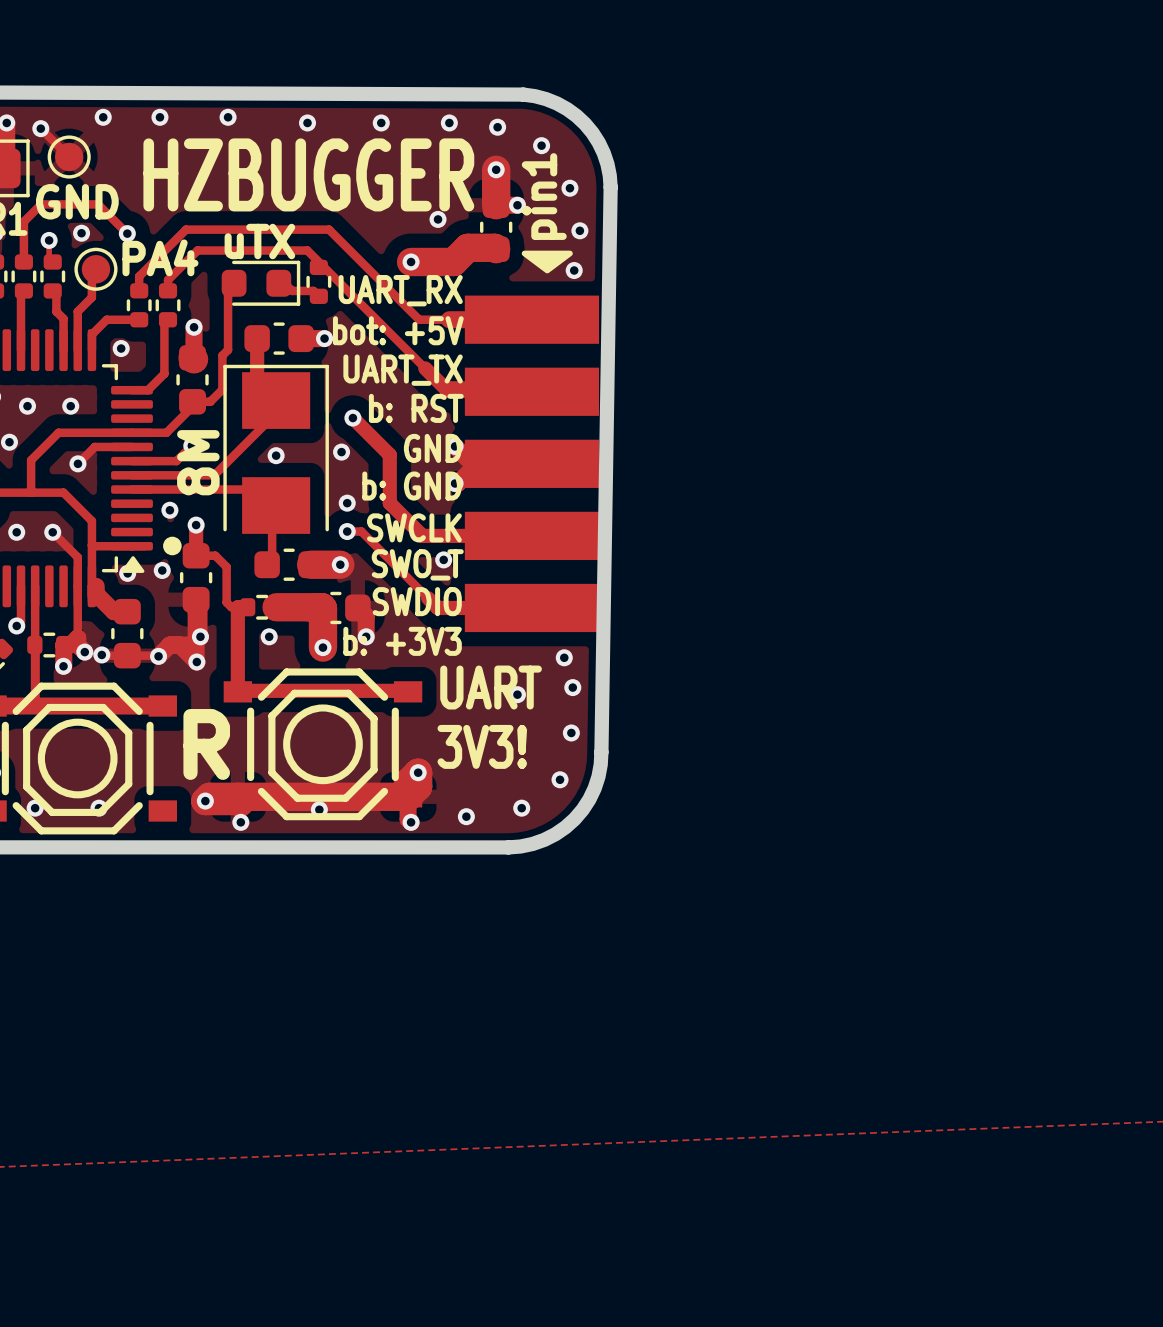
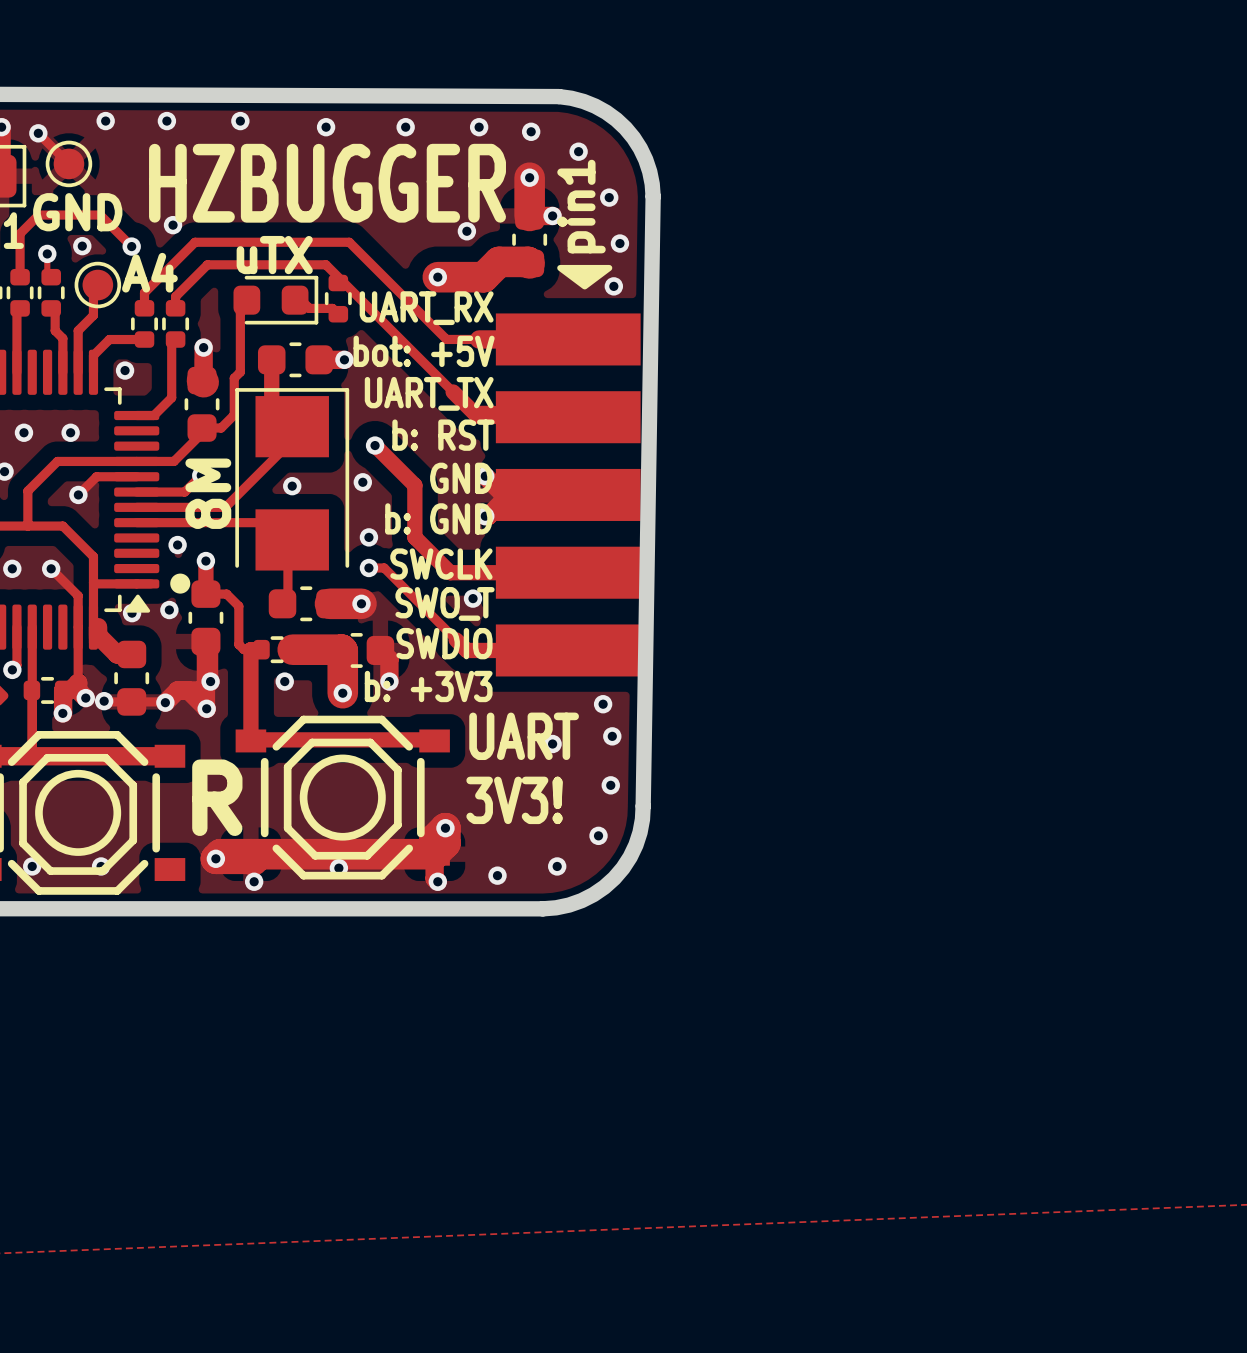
via: none -> (173, 225)
text: PA4 (160, 257) -> A4 (149, 272)

